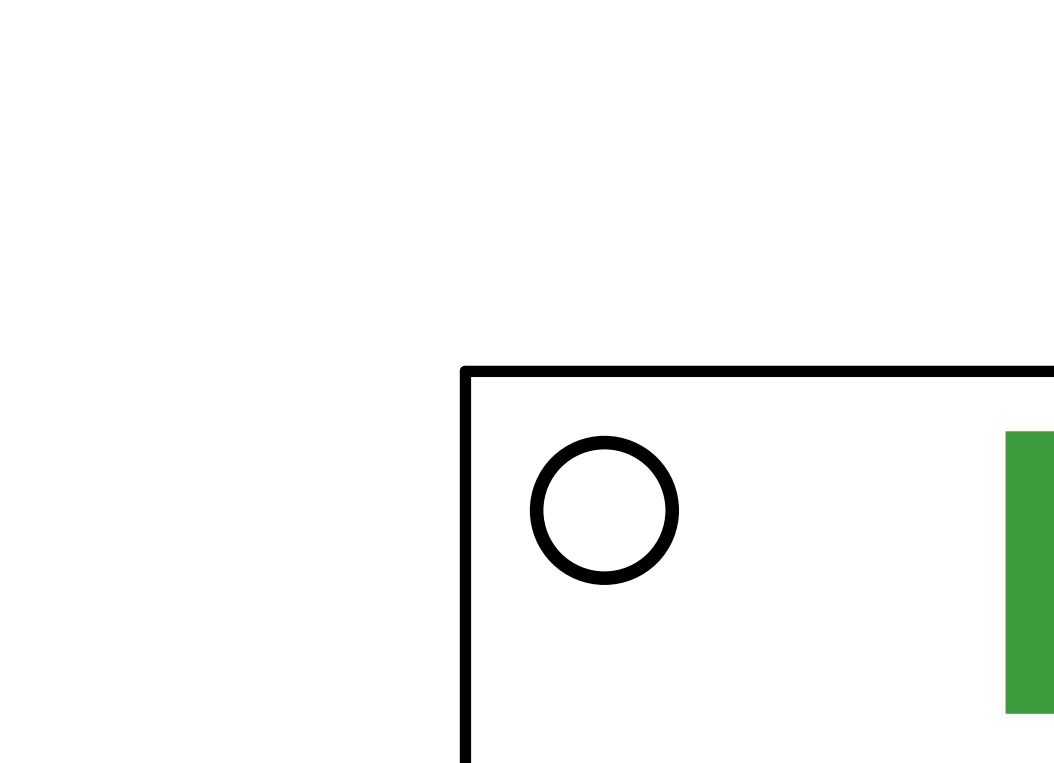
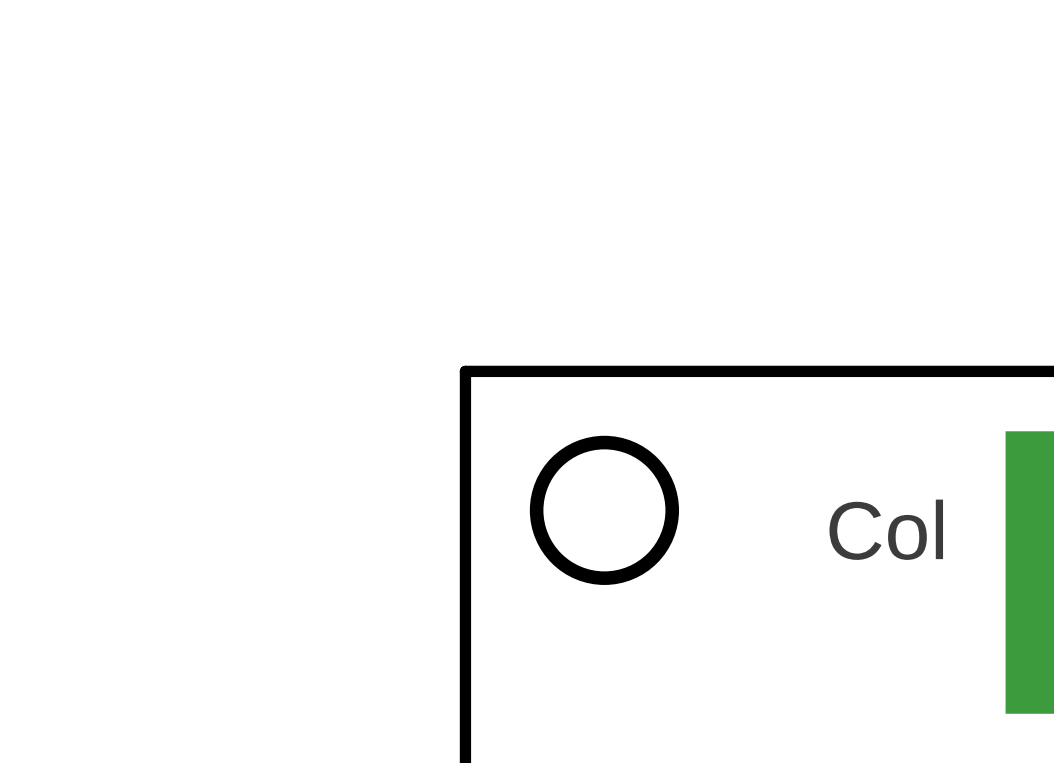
text: none -> Col (886, 529)

